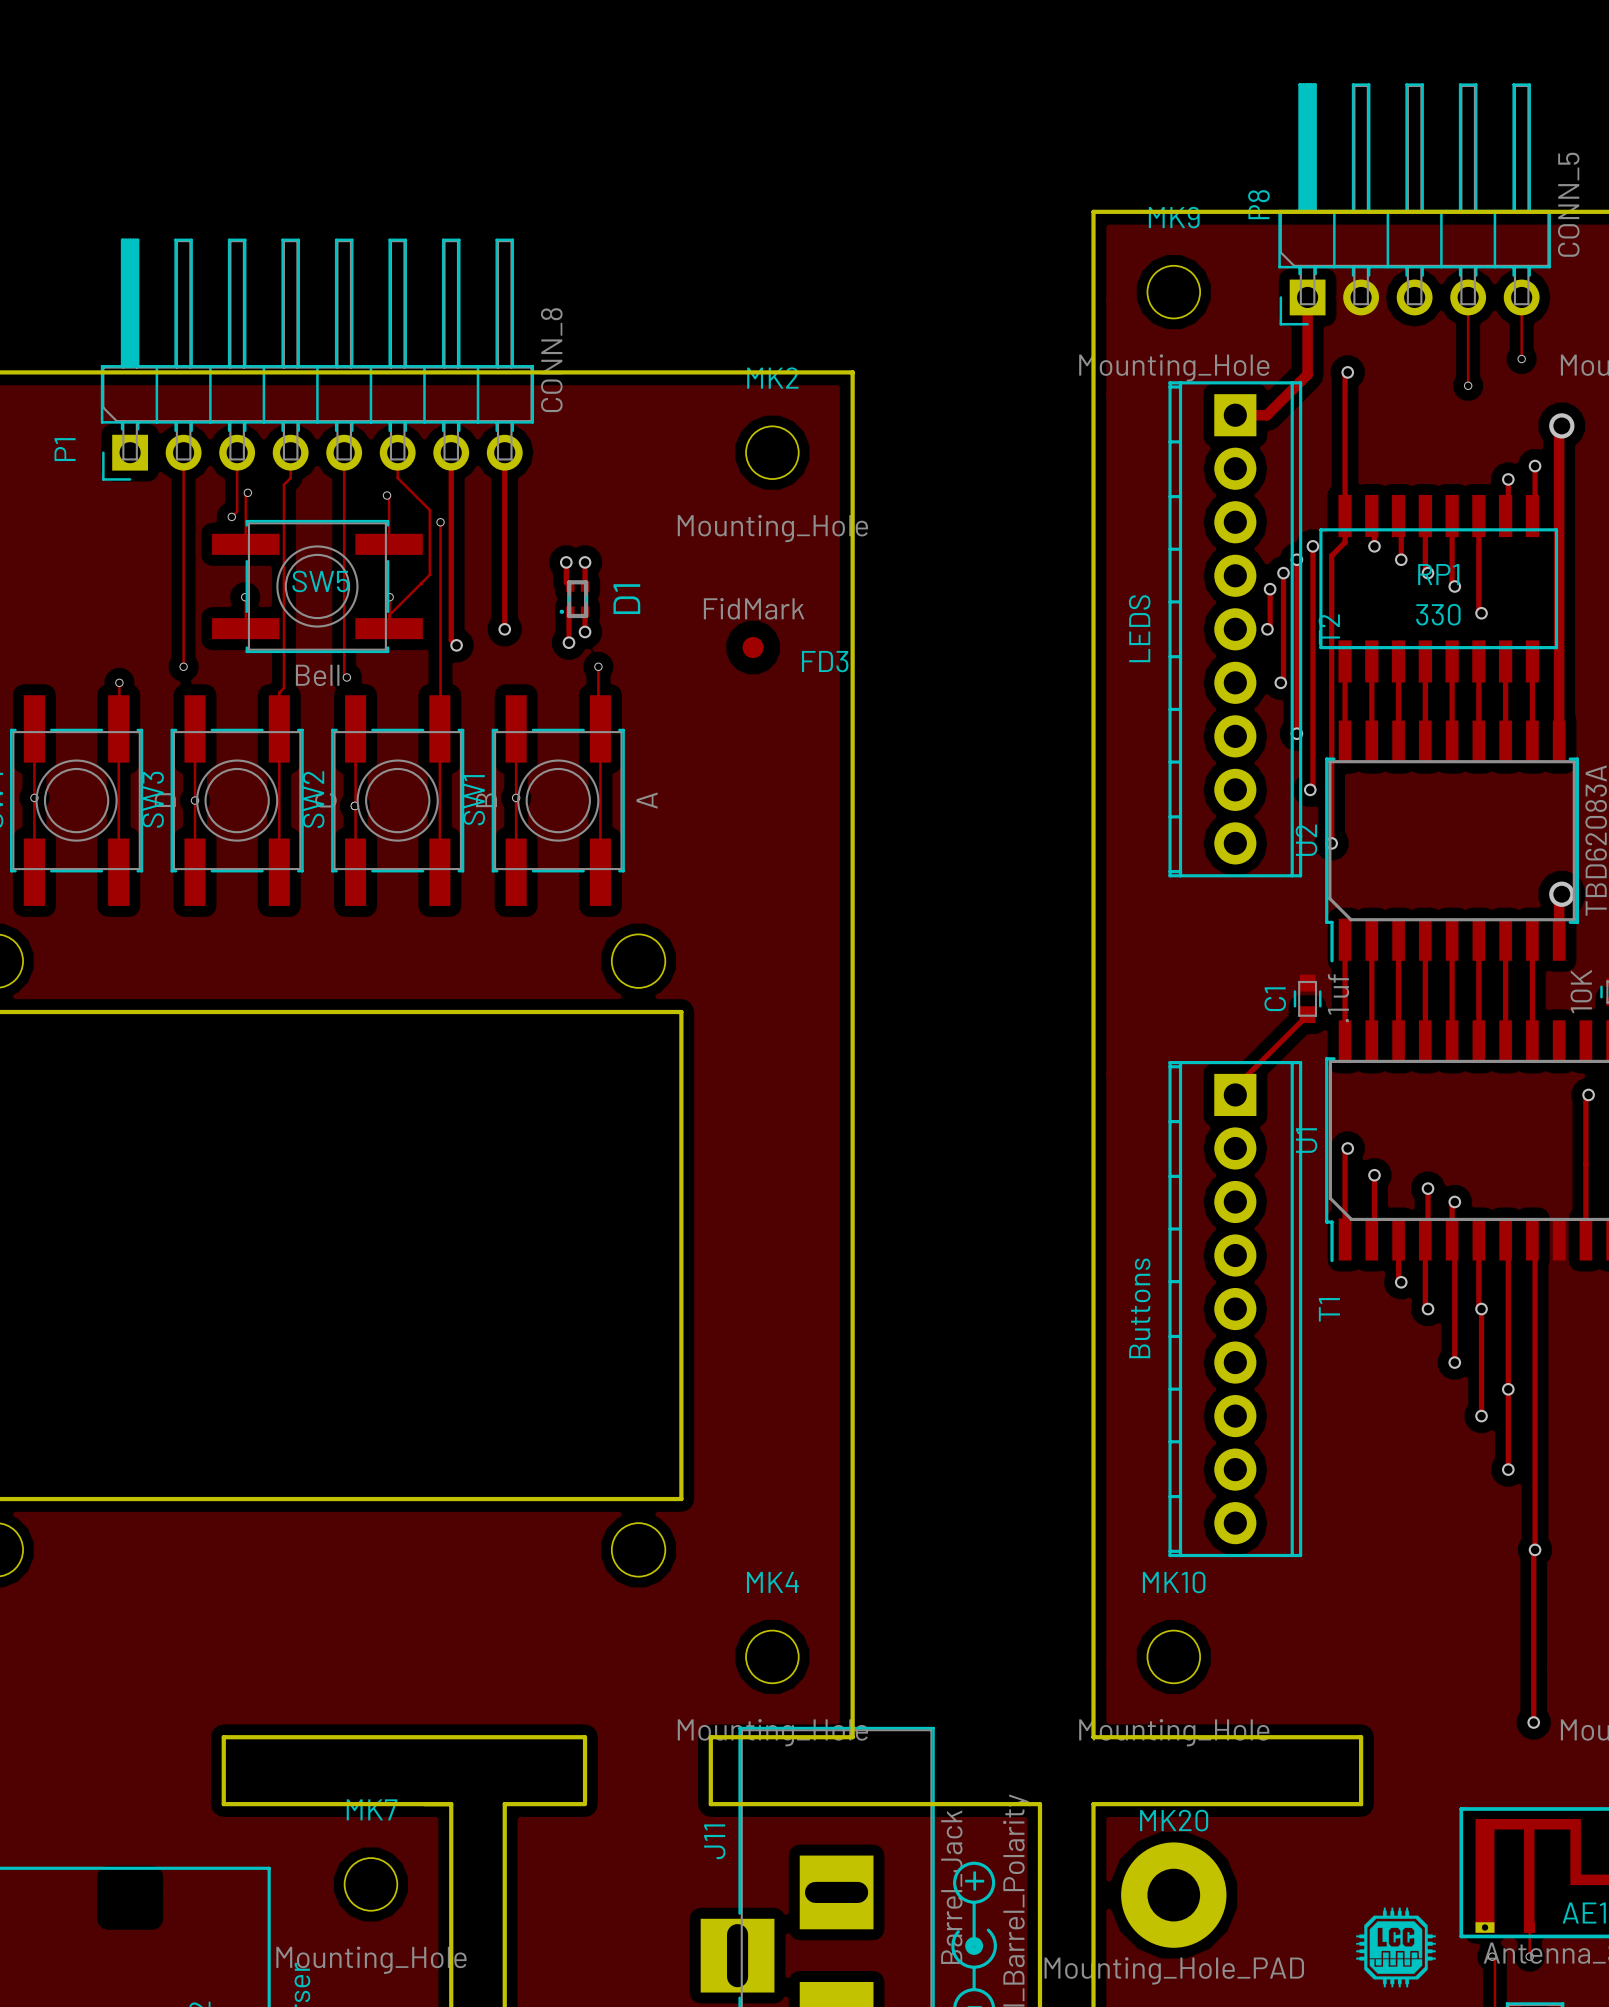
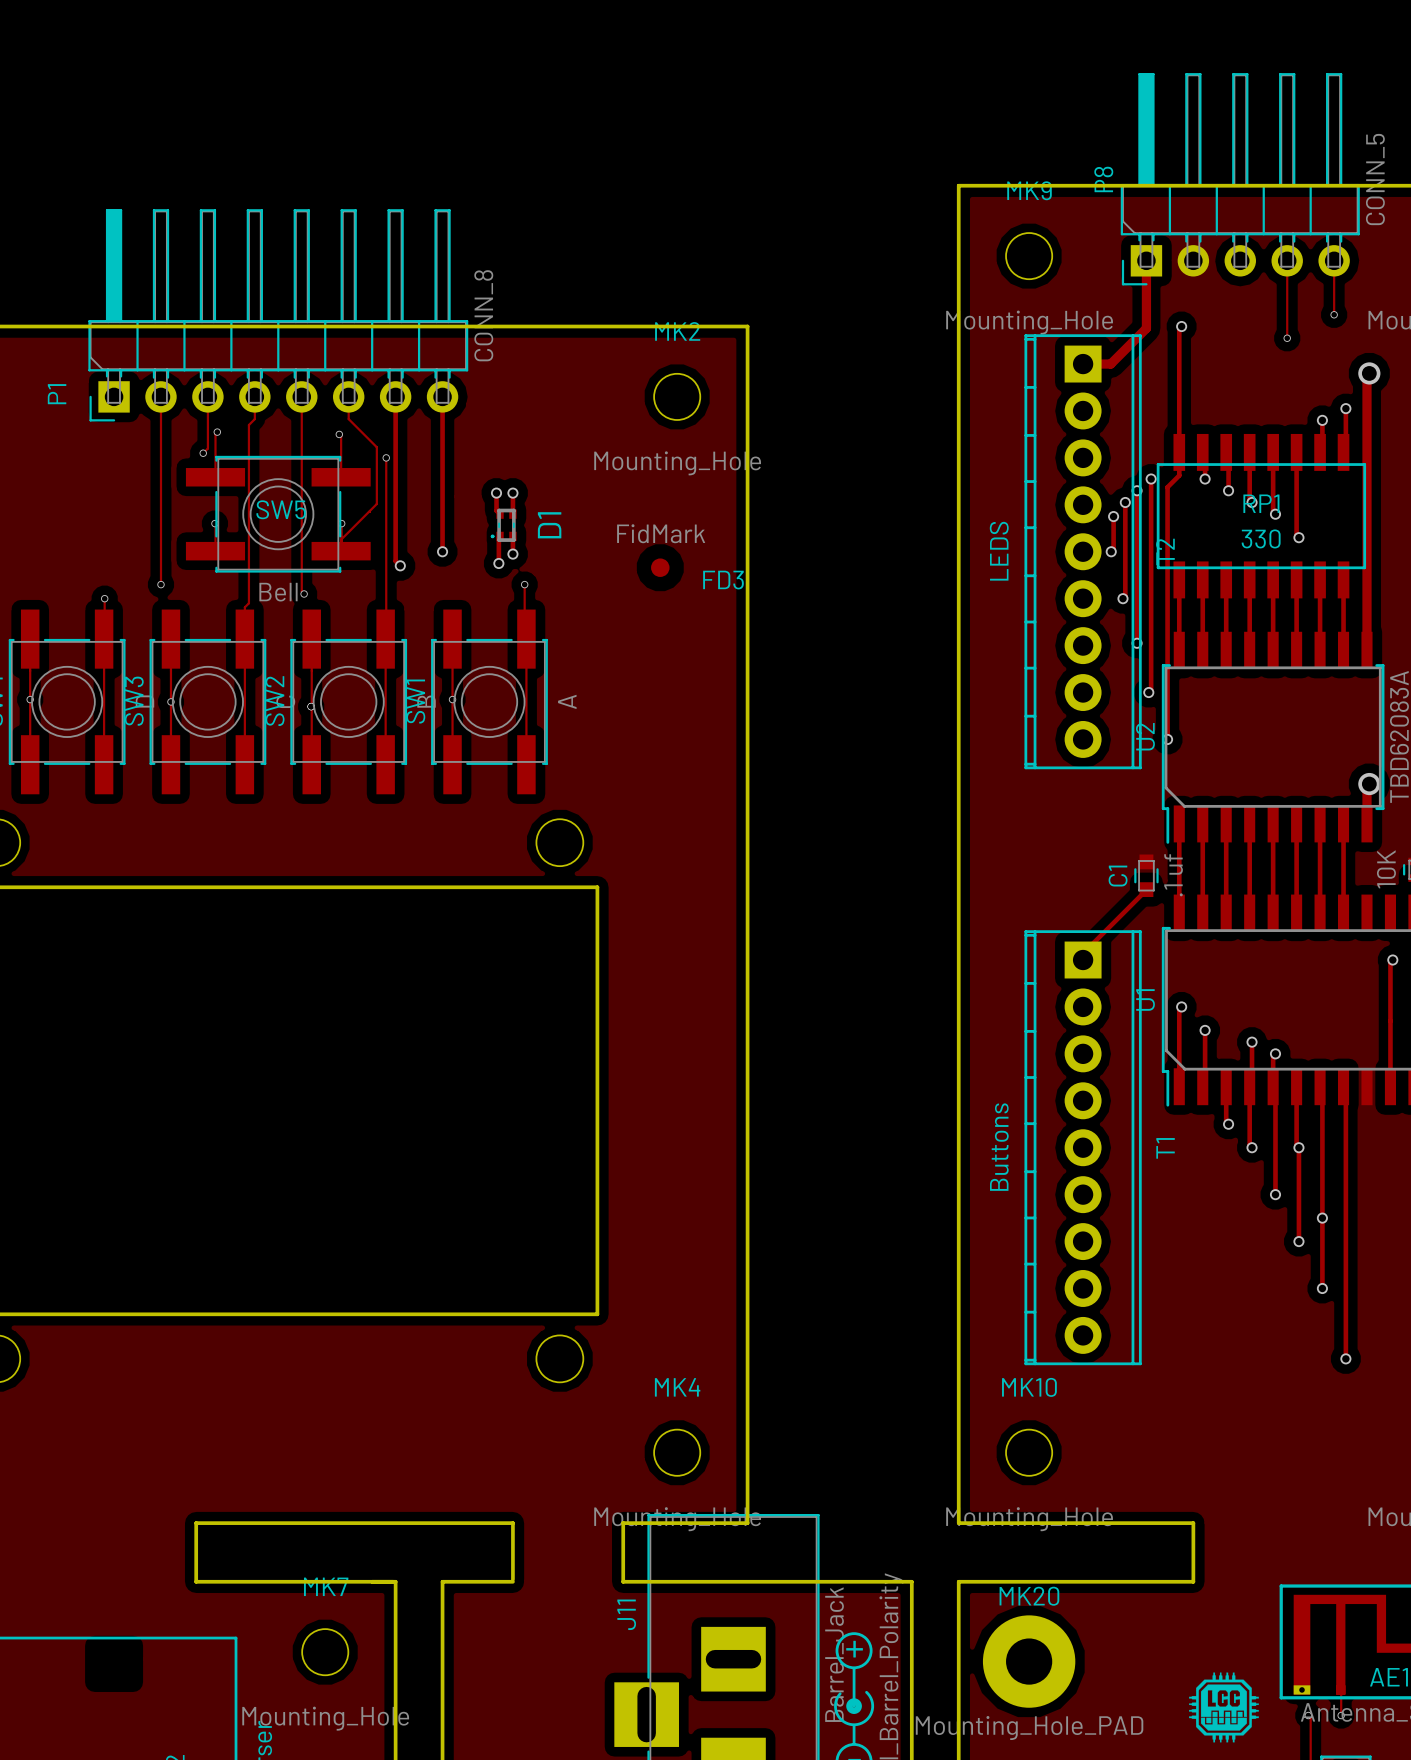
track: (1535, 1549) (1533, 1722) -> none
via: (1533, 1722) -> none

